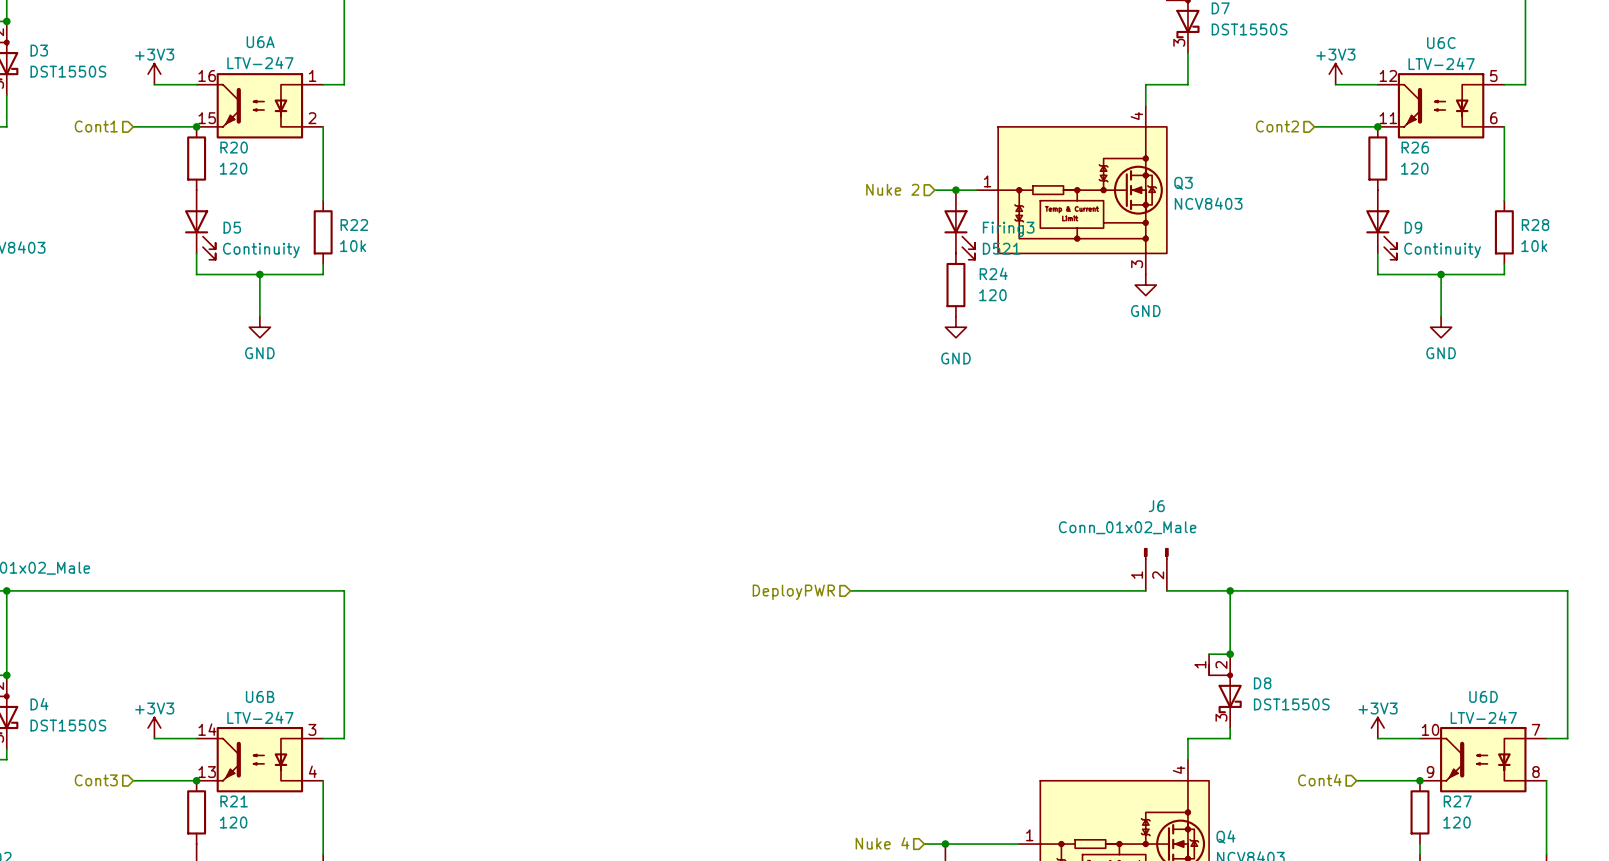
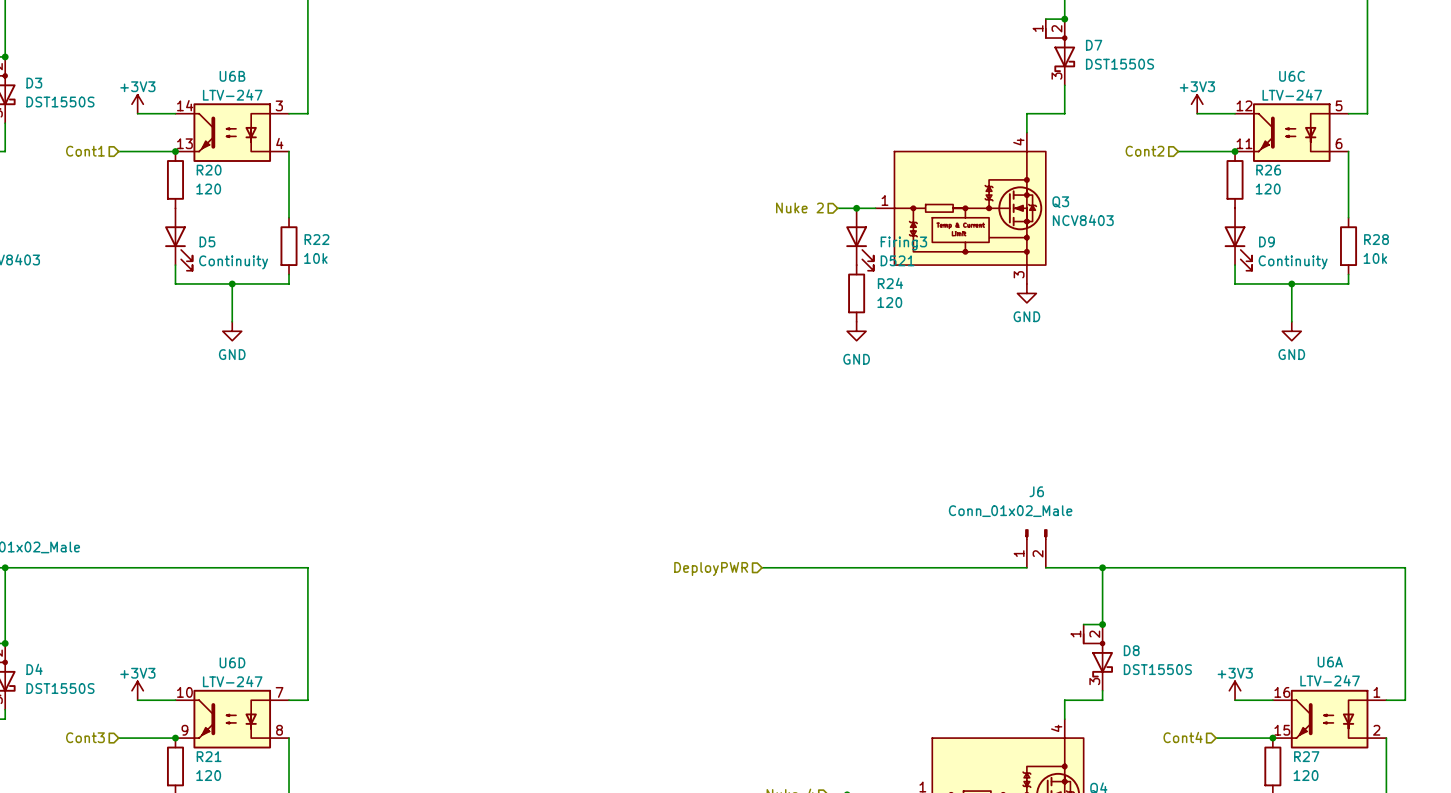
U6A position: (259, 105) -> (1329, 719)
U6B position: (259, 759) -> (232, 132)
U6D position: (1483, 759) -> (232, 719)

